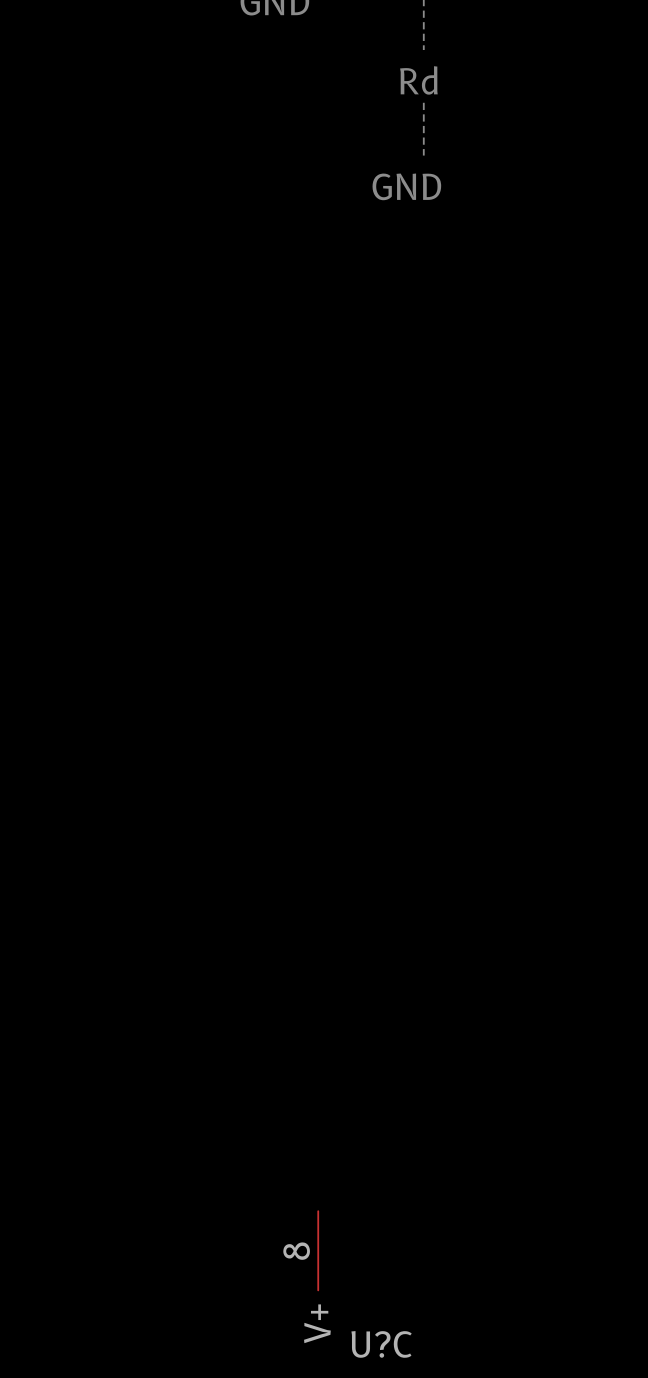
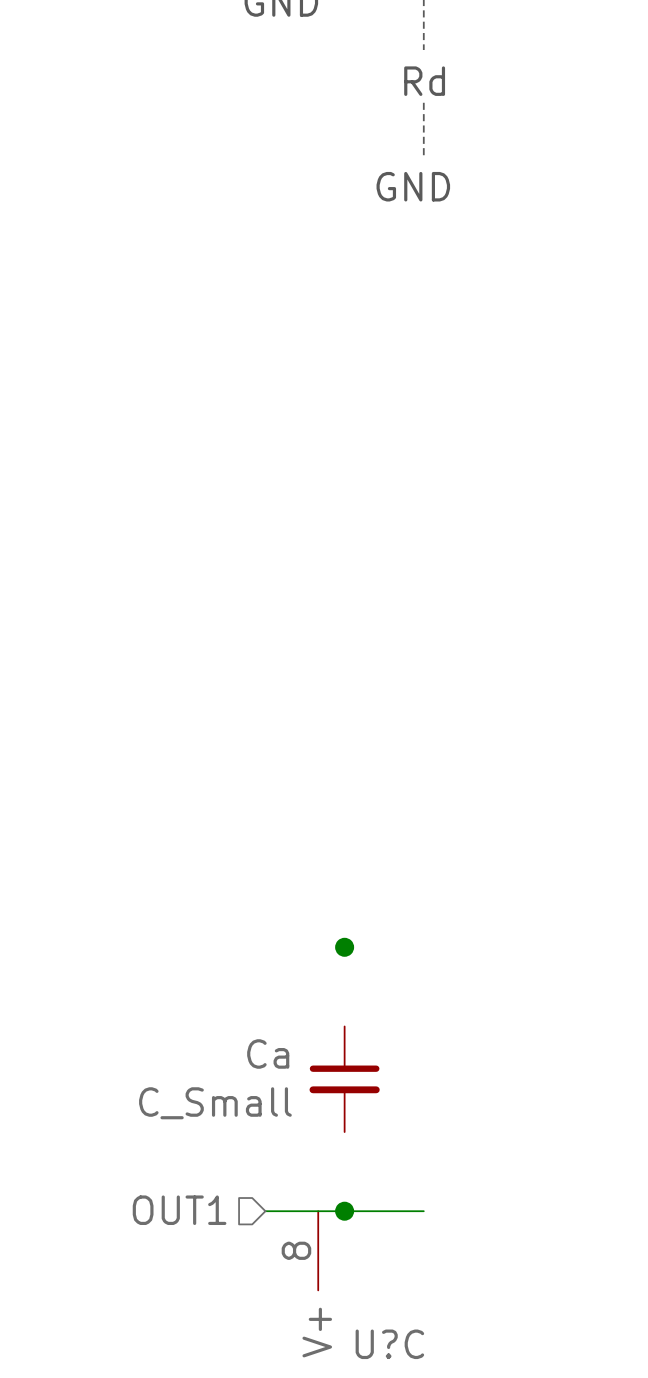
junction: none -> (344, 947)
Ca: none -> C_Small (344, 1079)
hierarchical label: none -> OUT1 (179, 1210)
wire: none -> (265, 1211) (423, 1211)
junction: none -> (344, 1211)

